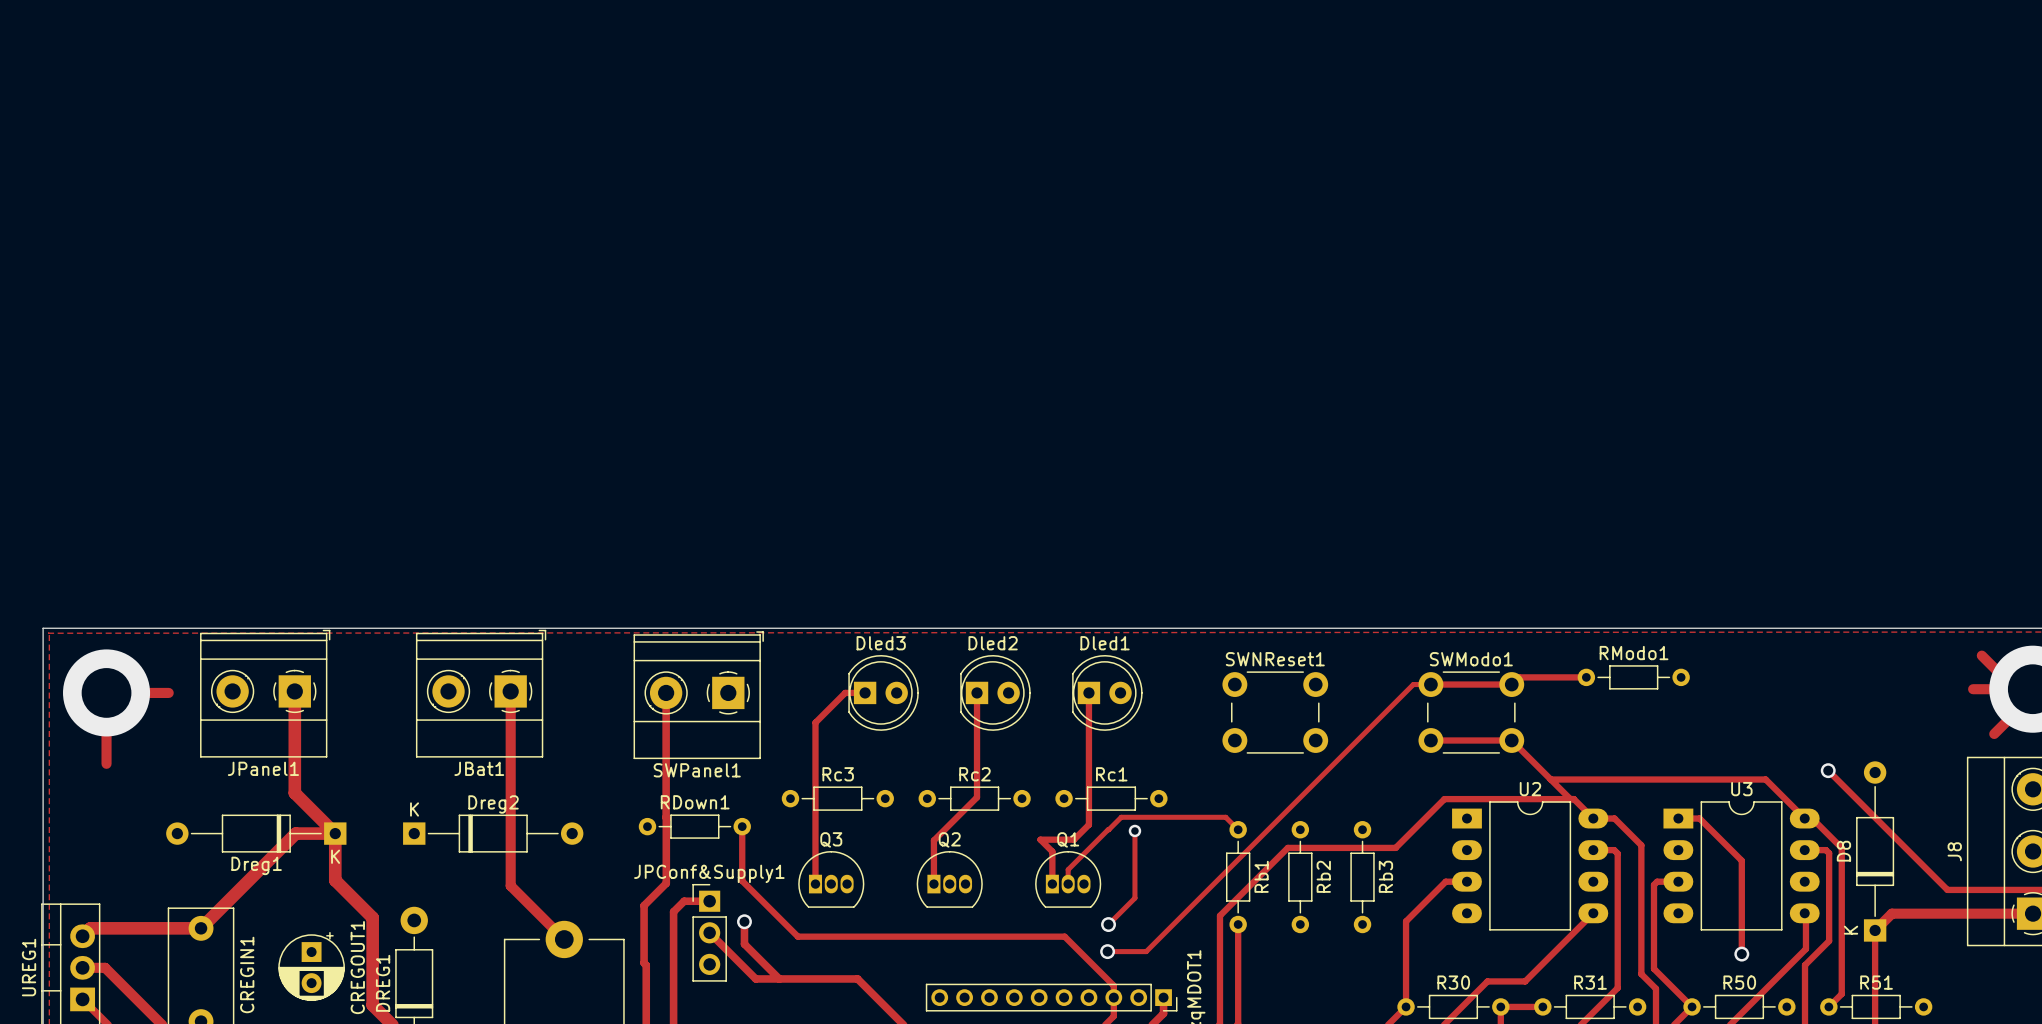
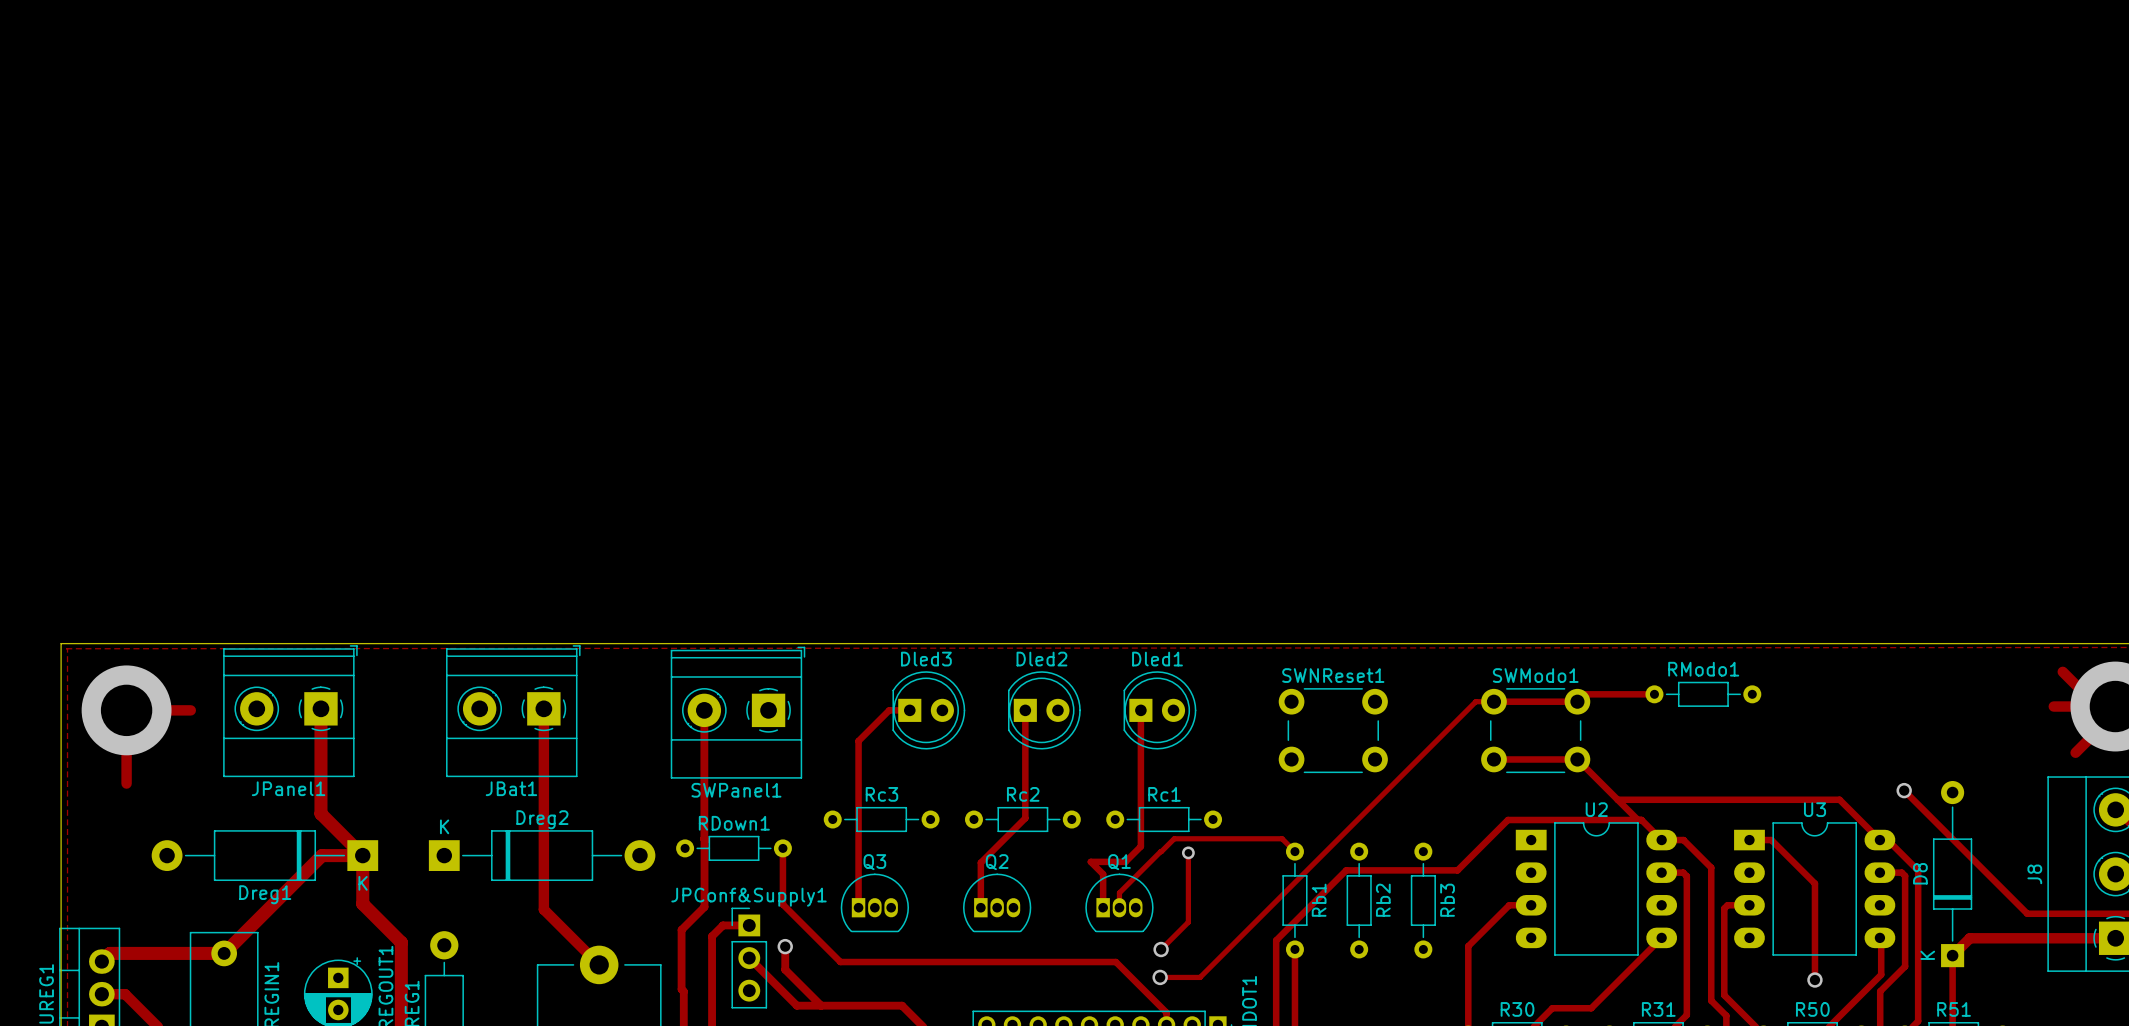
Dreg1 footprint: [166, 814, 347, 853] -> [151, 830, 379, 882]
Dreg2 footprint: [403, 814, 584, 853] -> [428, 830, 656, 882]

